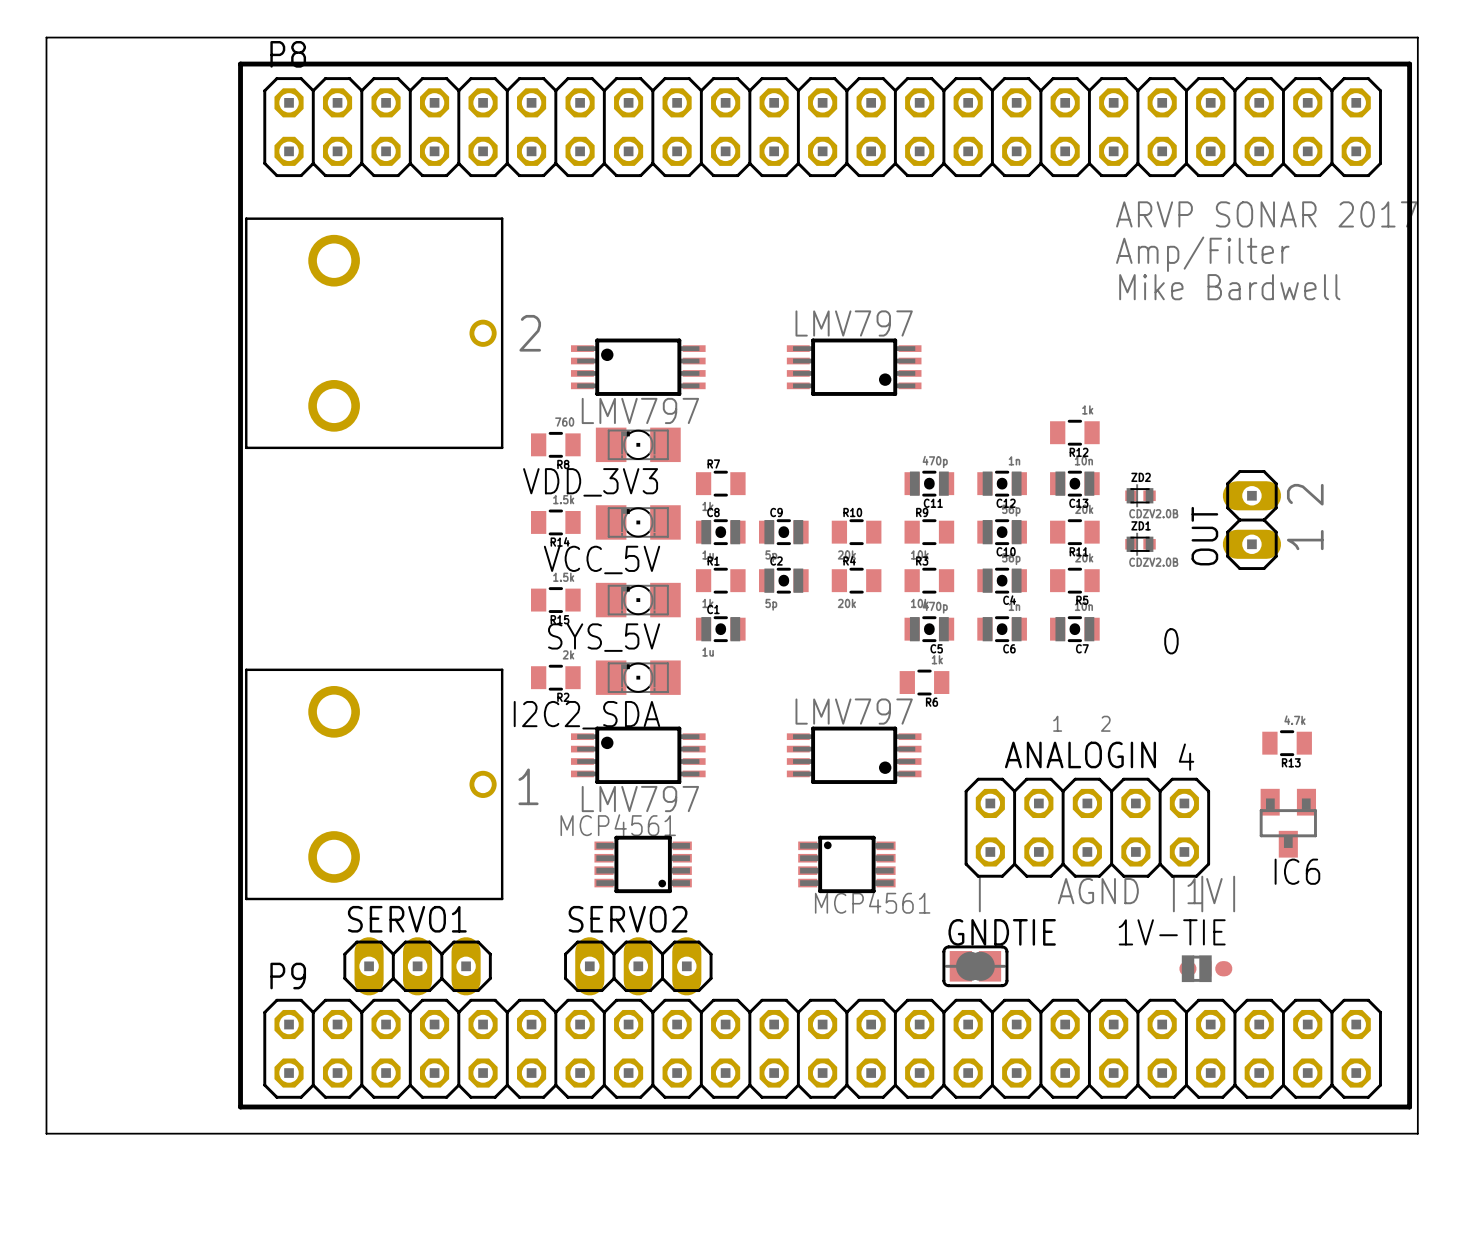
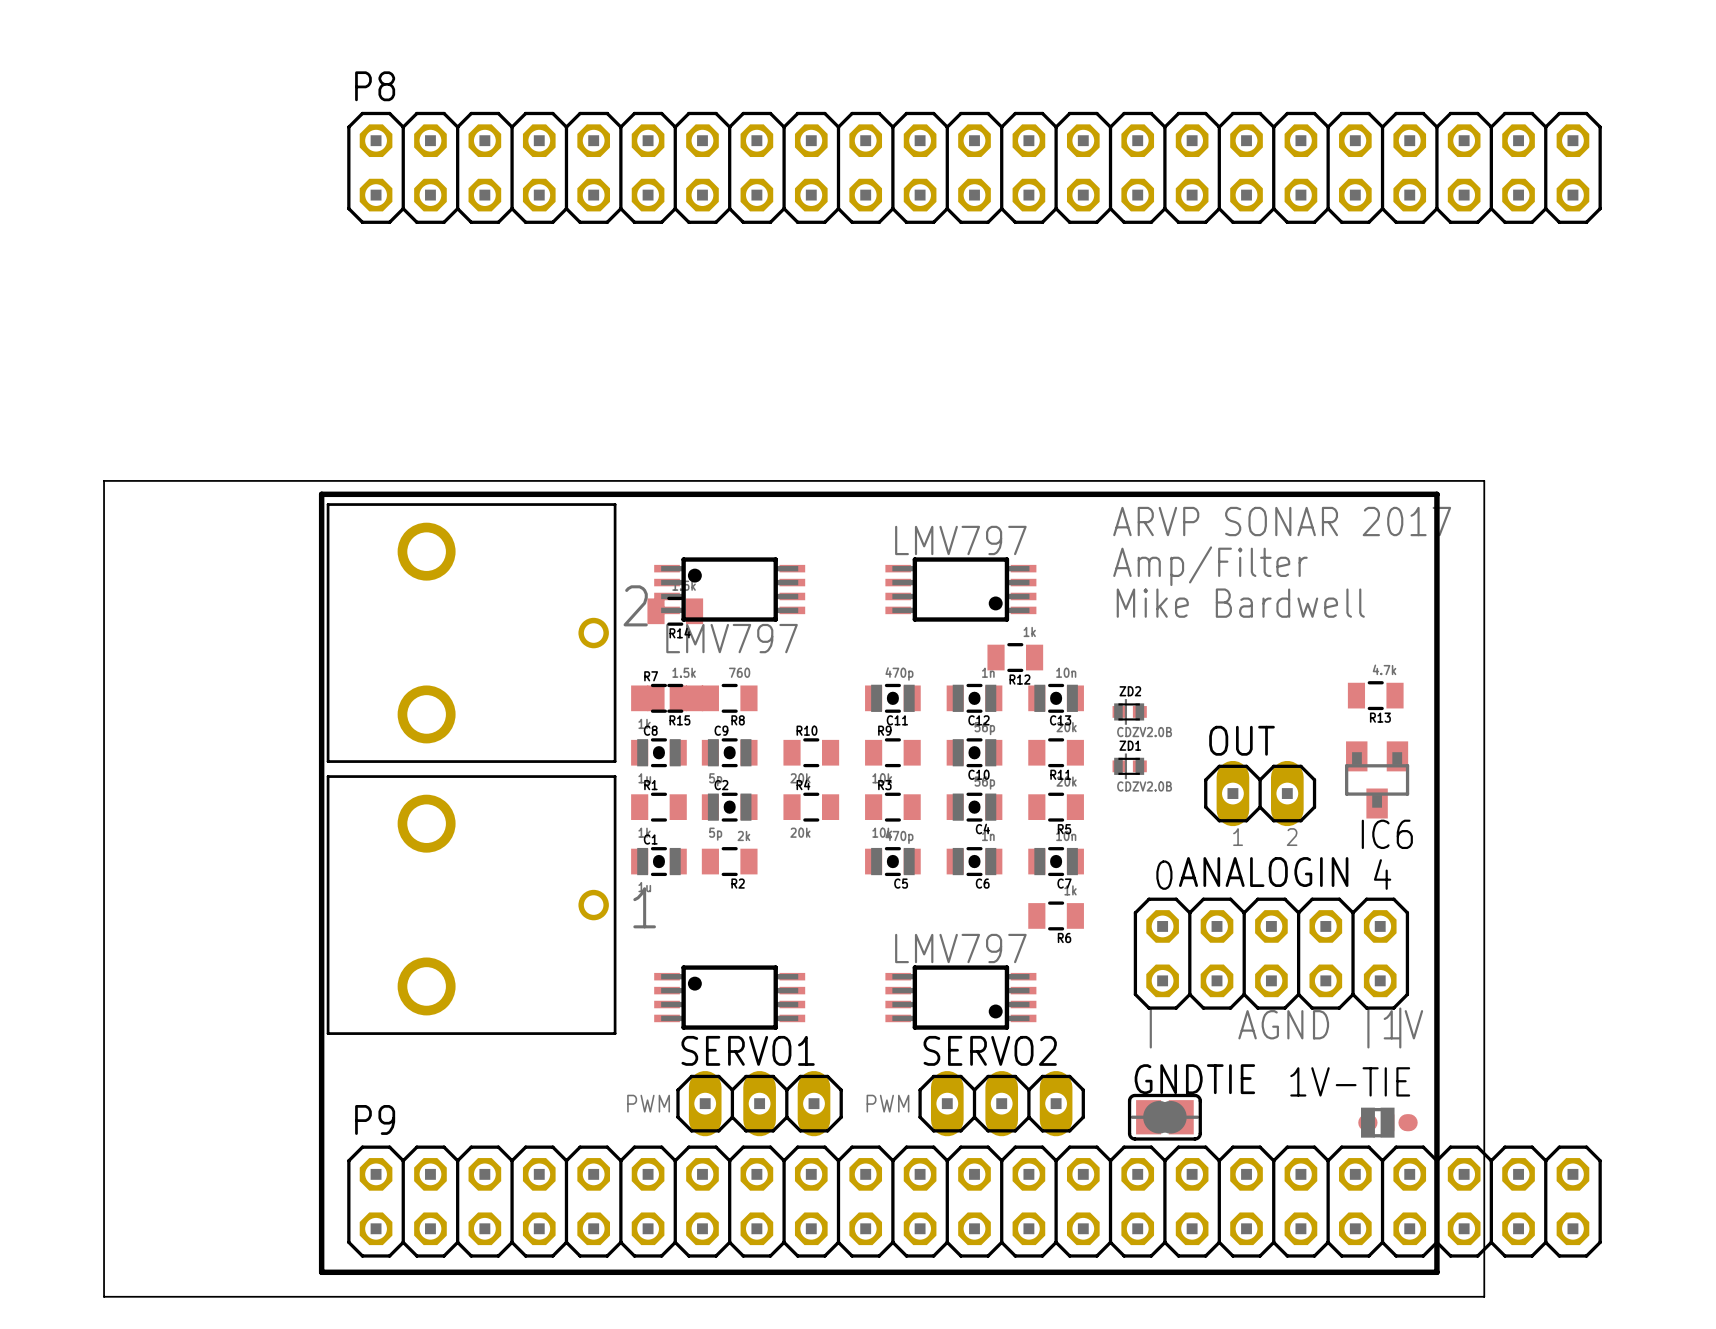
text position: ARVP SONAR 2017 (1266, 214) -> ARVP SONAR 2017 (1282, 521)
text position: Amp/Filter (1202, 254) -> Amp/Filter (1210, 566)
text position: Mike Bardwell (1229, 287) -> Mike Bardwell (1240, 603)
part position: (374, 333) -> (471, 633)
text position: 2 (530, 333) -> 2 (635, 605)
part: LMV797 (638, 367) -> none
part: LMV797 (854, 367) -> none
board edge: (46, 406) (46, 37) (1417, 37) (1417, 1133) (1277, 1133) -> (104, 480) (1484, 480) (1484, 1296)
board edge: (240, 418) (240, 64) (1409, 64) (1409, 1106) (240, 1106) -> (321, 494) (1436, 494) (1436, 1272) (321, 1272) (321, 1266)
R12 position: (1074, 432) -> (1015, 657)
R8 position: (555, 444) -> (729, 698)
VDD_3V3: (638, 444) -> none
R7 position: (720, 483) -> (658, 698)
C11 position: (929, 483) -> (892, 698)
C12 position: (1002, 483) -> (974, 698)
C13 position: (1074, 483) -> (1056, 698)
text: 2 (1305, 494) -> none
ZD2 position: (1140, 495) -> (1129, 711)
part: none -> LMV797 (729, 589)
part: none -> LMV797 (960, 589)
OUT rotation: 0° (1251, 520) -> 90° clockwise (1260, 793)
OUT position: (1251, 520) -> (1260, 793)
VCC_5V: (638, 522) -> none
C8 position: (720, 532) -> (658, 752)
C9 position: (783, 532) -> (729, 752)
R10 position: (856, 532) -> (811, 752)
R9 position: (929, 532) -> (892, 752)
C10 position: (1002, 532) -> (974, 752)
R11 position: (1074, 532) -> (1056, 752)
text: 1 (1305, 540) -> none
ZD1 position: (1140, 544) -> (1129, 766)
R1 position: (720, 580) -> (658, 807)
C2 position: (783, 580) -> (729, 807)
R4 position: (856, 580) -> (811, 807)
R3 position: (929, 580) -> (892, 807)
C4 position: (1002, 580) -> (974, 807)
R5 position: (1074, 580) -> (1056, 807)
SYS_5V: (638, 600) -> none
C1 position: (720, 629) -> (658, 861)
C5 position: (929, 629) -> (892, 861)
C6 position: (1002, 629) -> (974, 861)
C7 position: (1074, 629) -> (1056, 861)
text position: 0 (1171, 641) -> 0 (1164, 875)
R2 position: (555, 677) -> (729, 861)
I2C2_SDA: (638, 677) -> none
R6 position: (924, 682) -> (1056, 915)
R13 position: (1287, 743) -> (1375, 695)
part: LMV797 (638, 755) -> none
part: LMV797 (854, 755) -> none
IC6 position: (1288, 823) -> (1377, 779)
part: MCP4561 (643, 864) -> none
part: MCP4561 (846, 864) -> none
part: none -> (729, 997)
part: none -> LMV797 (960, 997)
text: none -> PWM (648, 1103)
text: none -> PWM (887, 1103)
SERVO1 position: (417, 966) -> (759, 1103)
SERVO2 position: (638, 966) -> (1001, 1103)
GNDTIE position: (975, 966) -> (1164, 1117)
1V-TIE position: (1205, 968) -> (1387, 1122)

